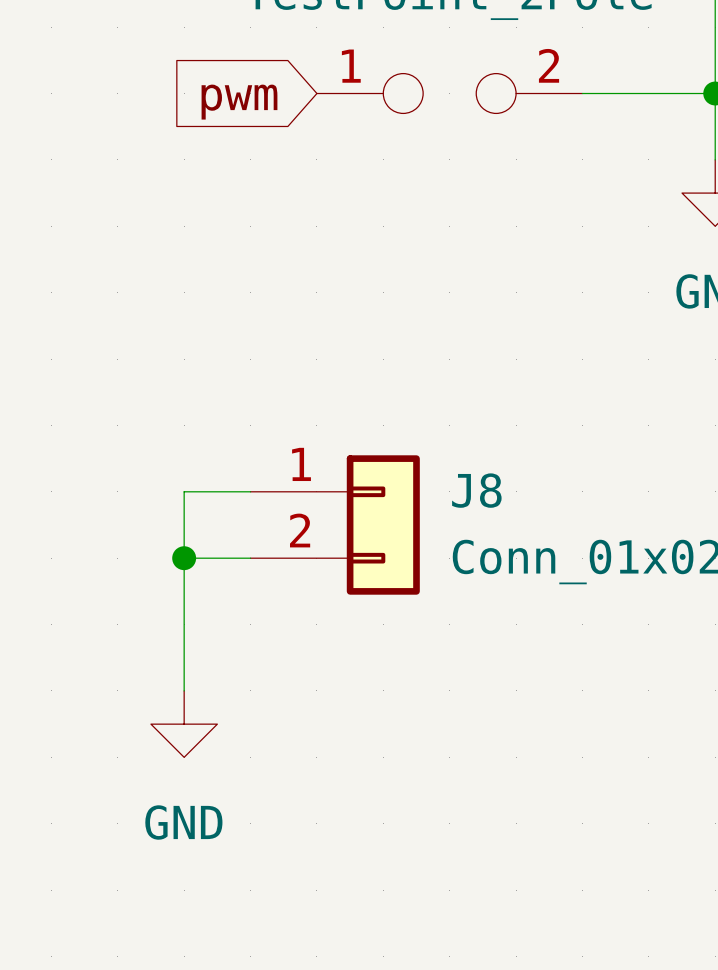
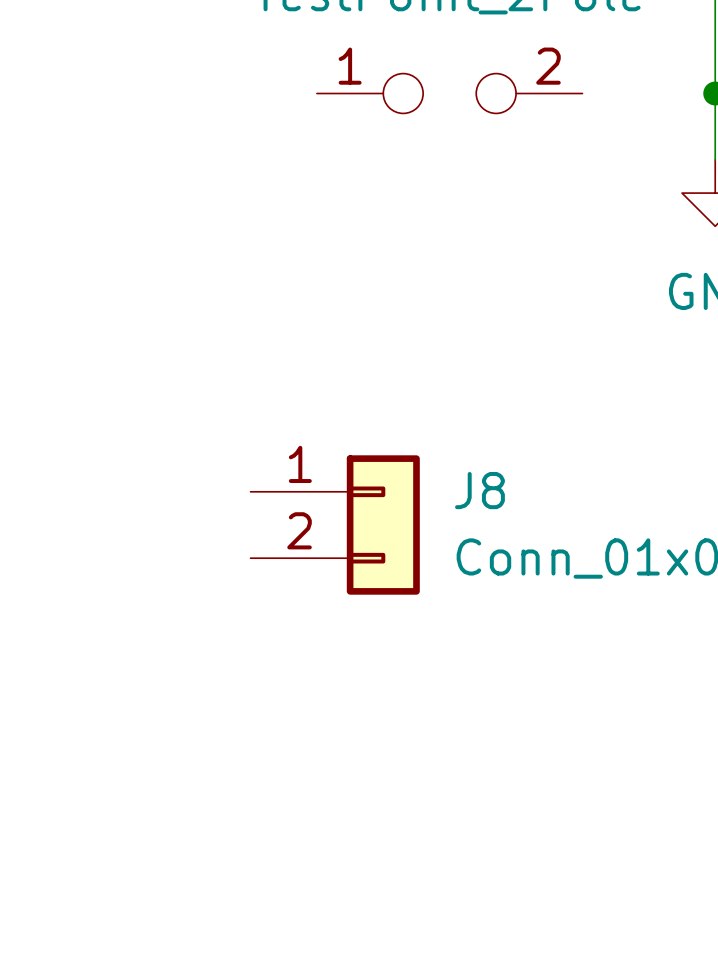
wire: (582, 93) (715, 93) -> none
global label: pwm (239, 102) -> none
wire: (250, 491) (184, 491) (184, 690) -> none
wire: (184, 558) (250, 558) -> none
junction: (184, 558) -> none
power symbol: GND (184, 724) -> none

